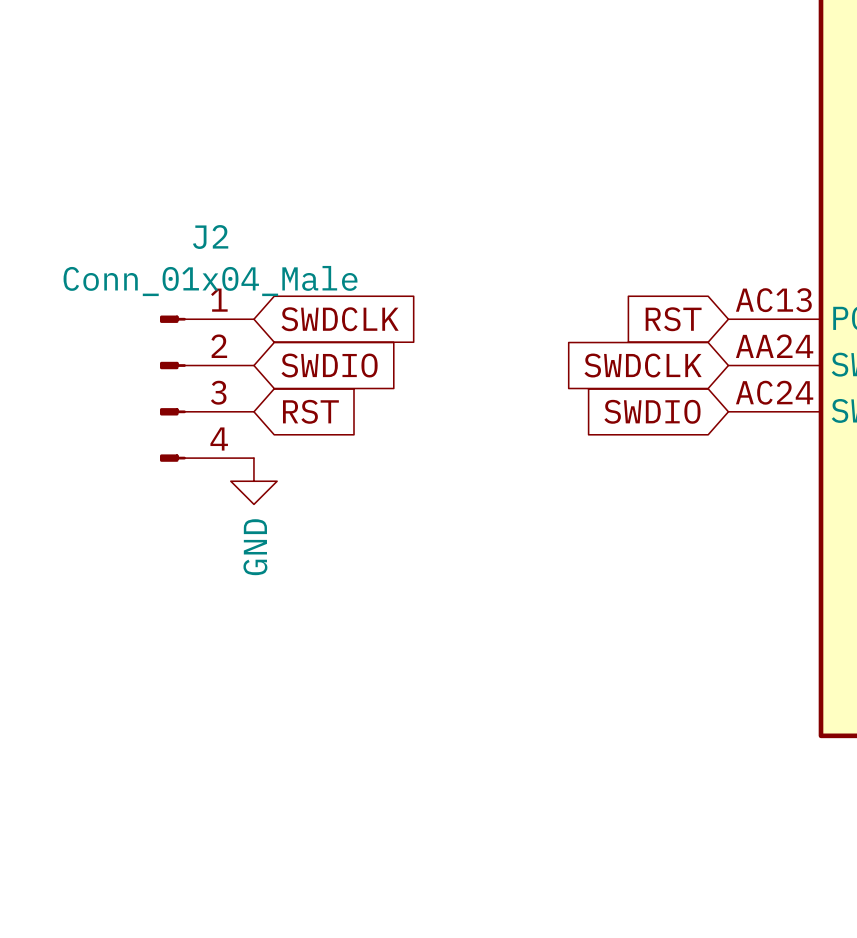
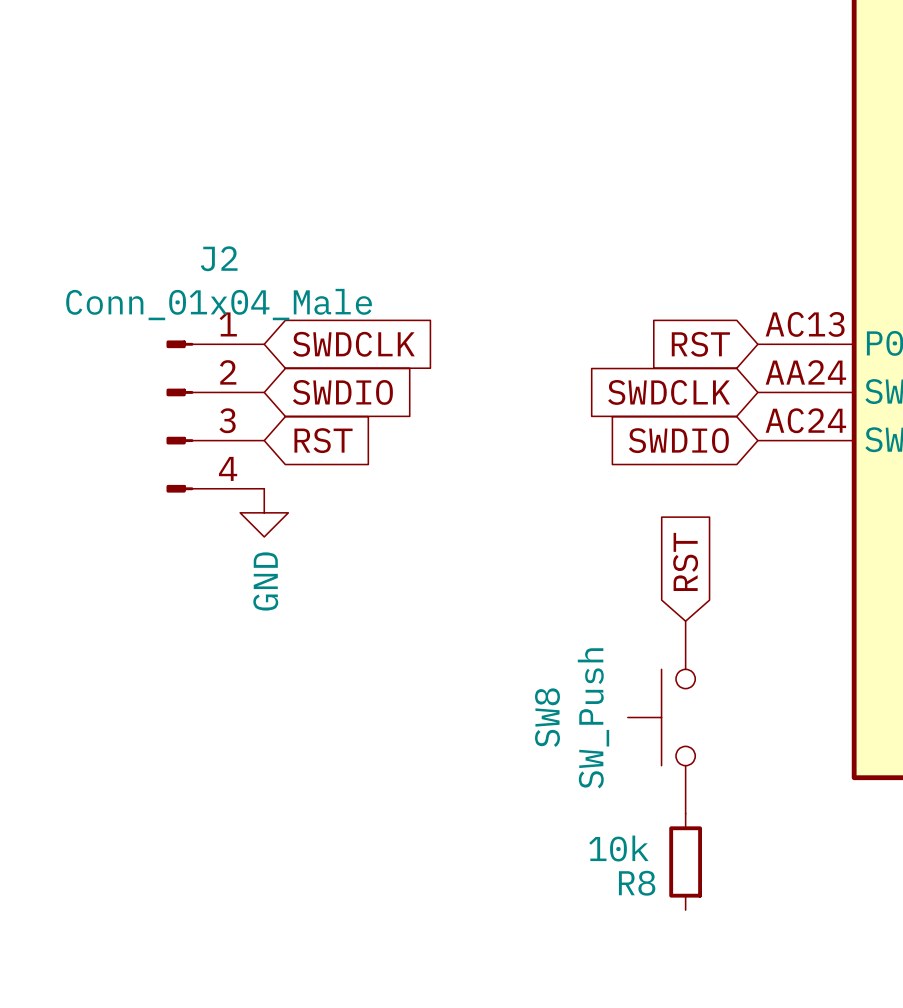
global label: none -> RST (685, 561)
SW8: none -> SW_Push (661, 717)
R8: none -> 10k (685, 861)

